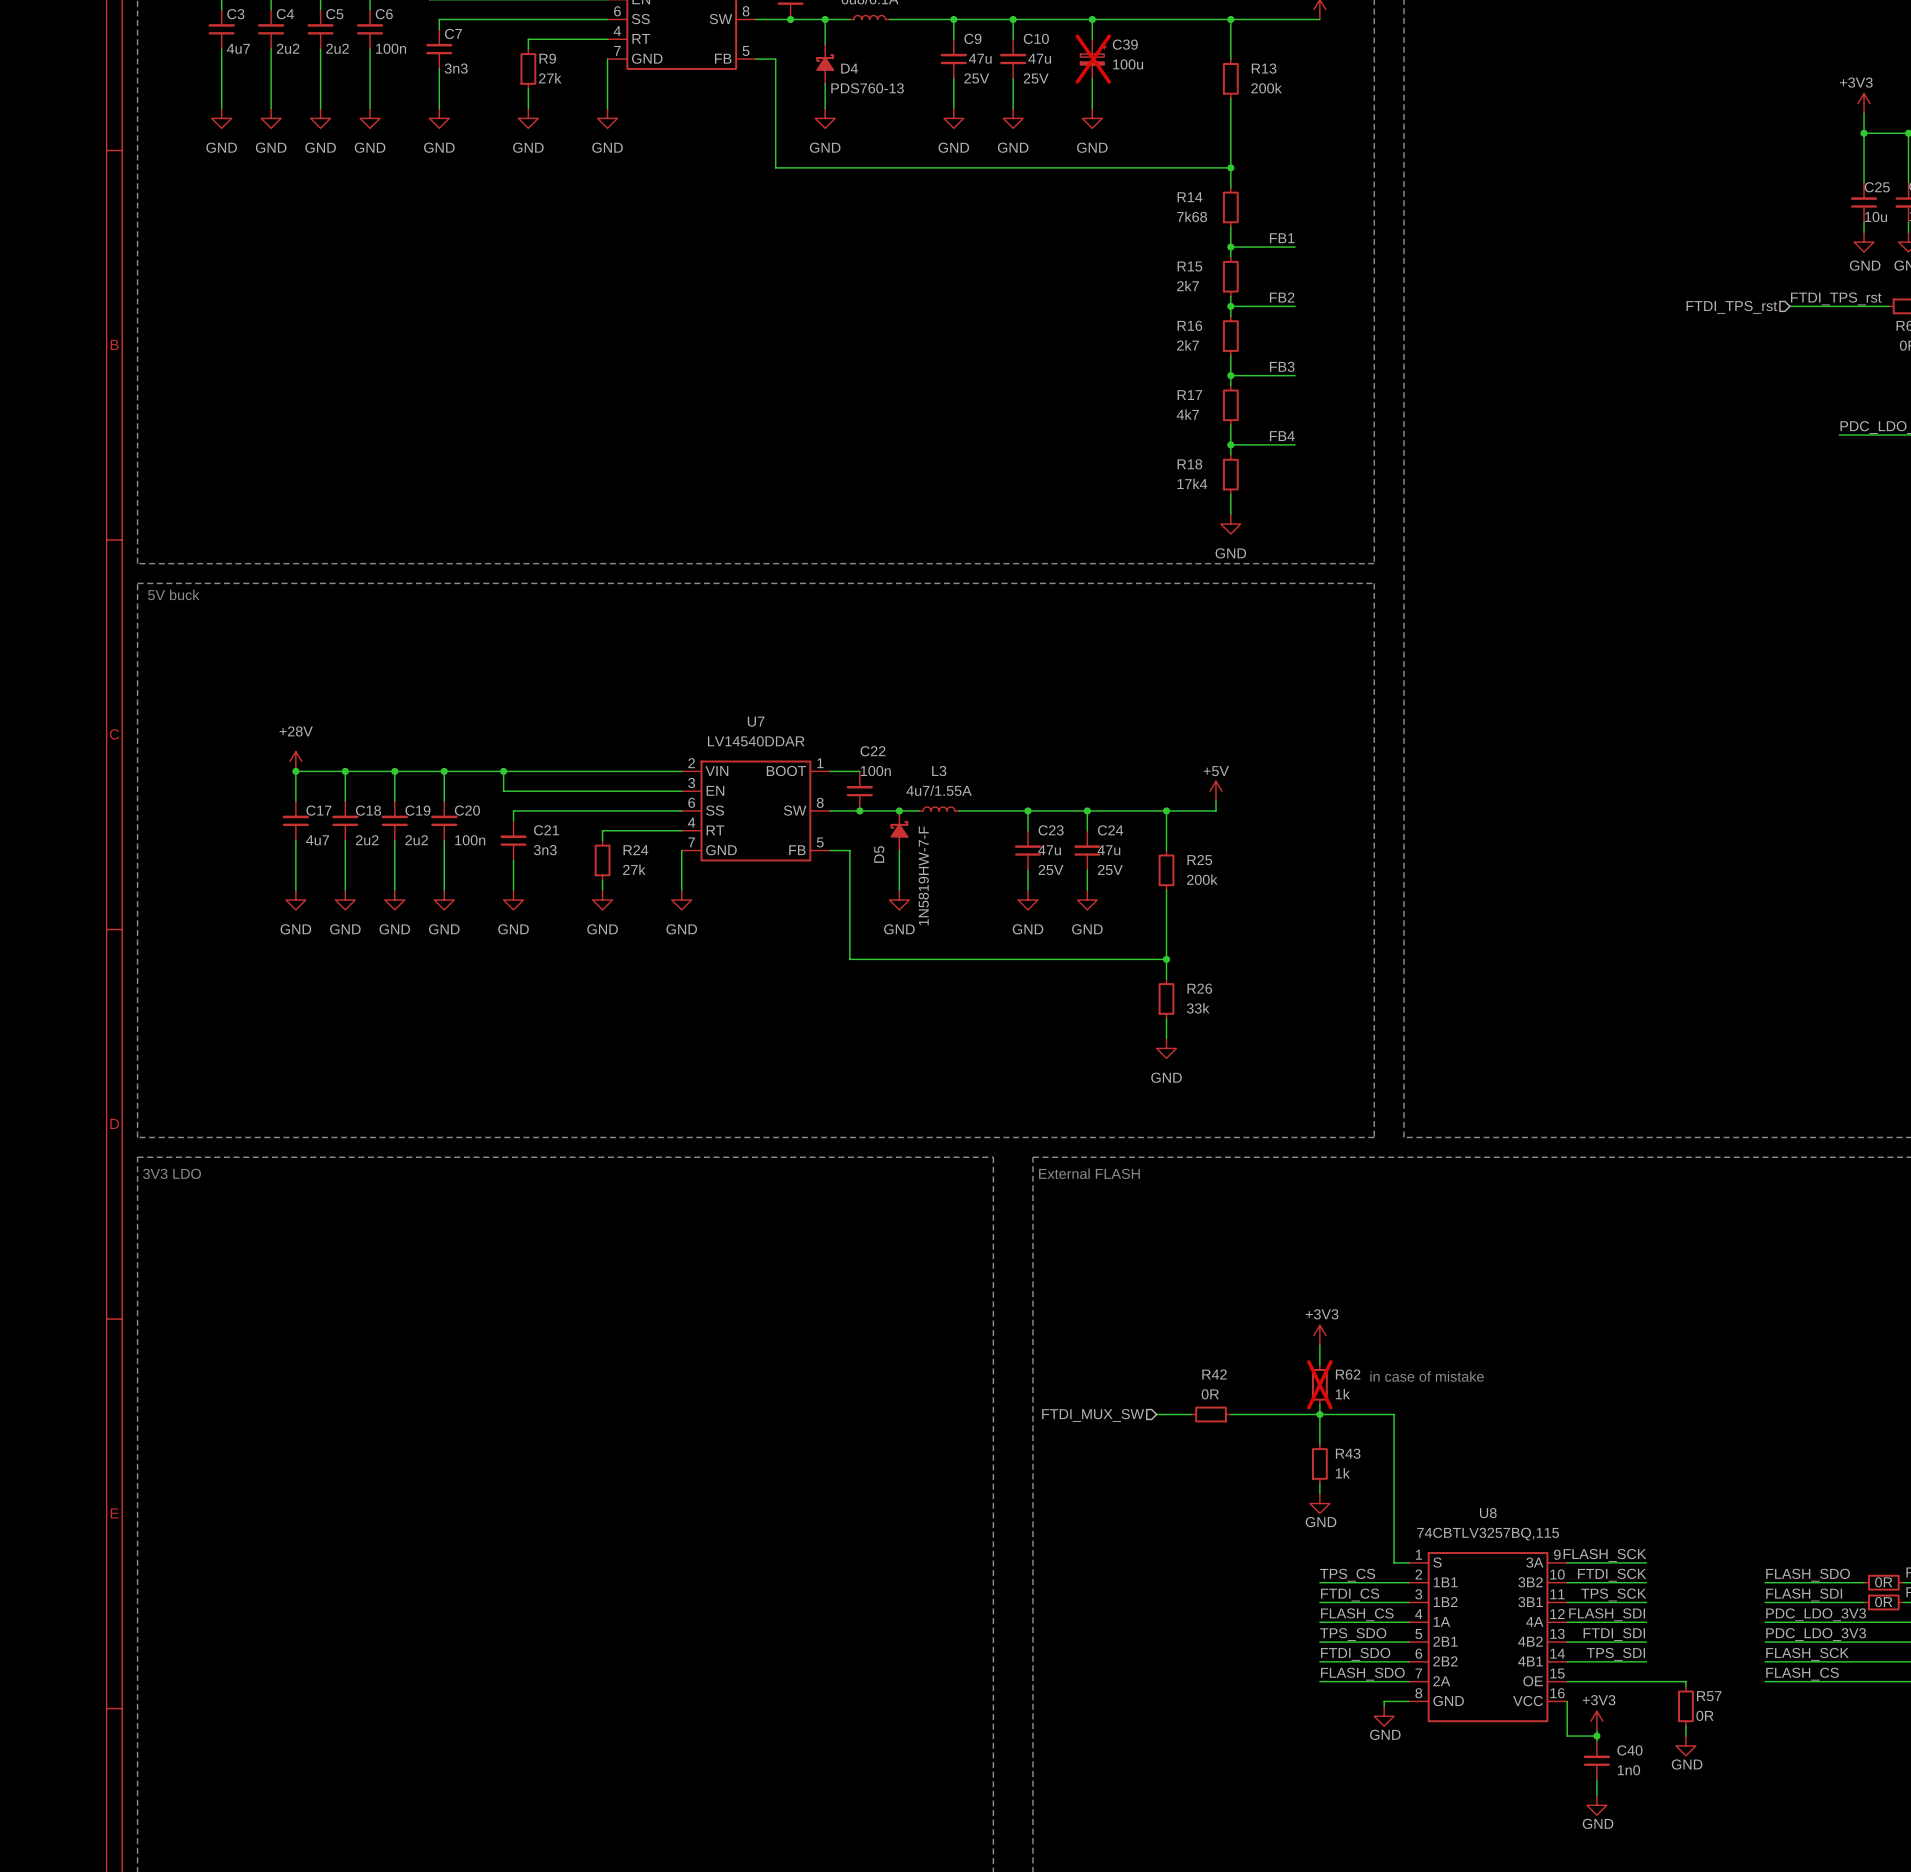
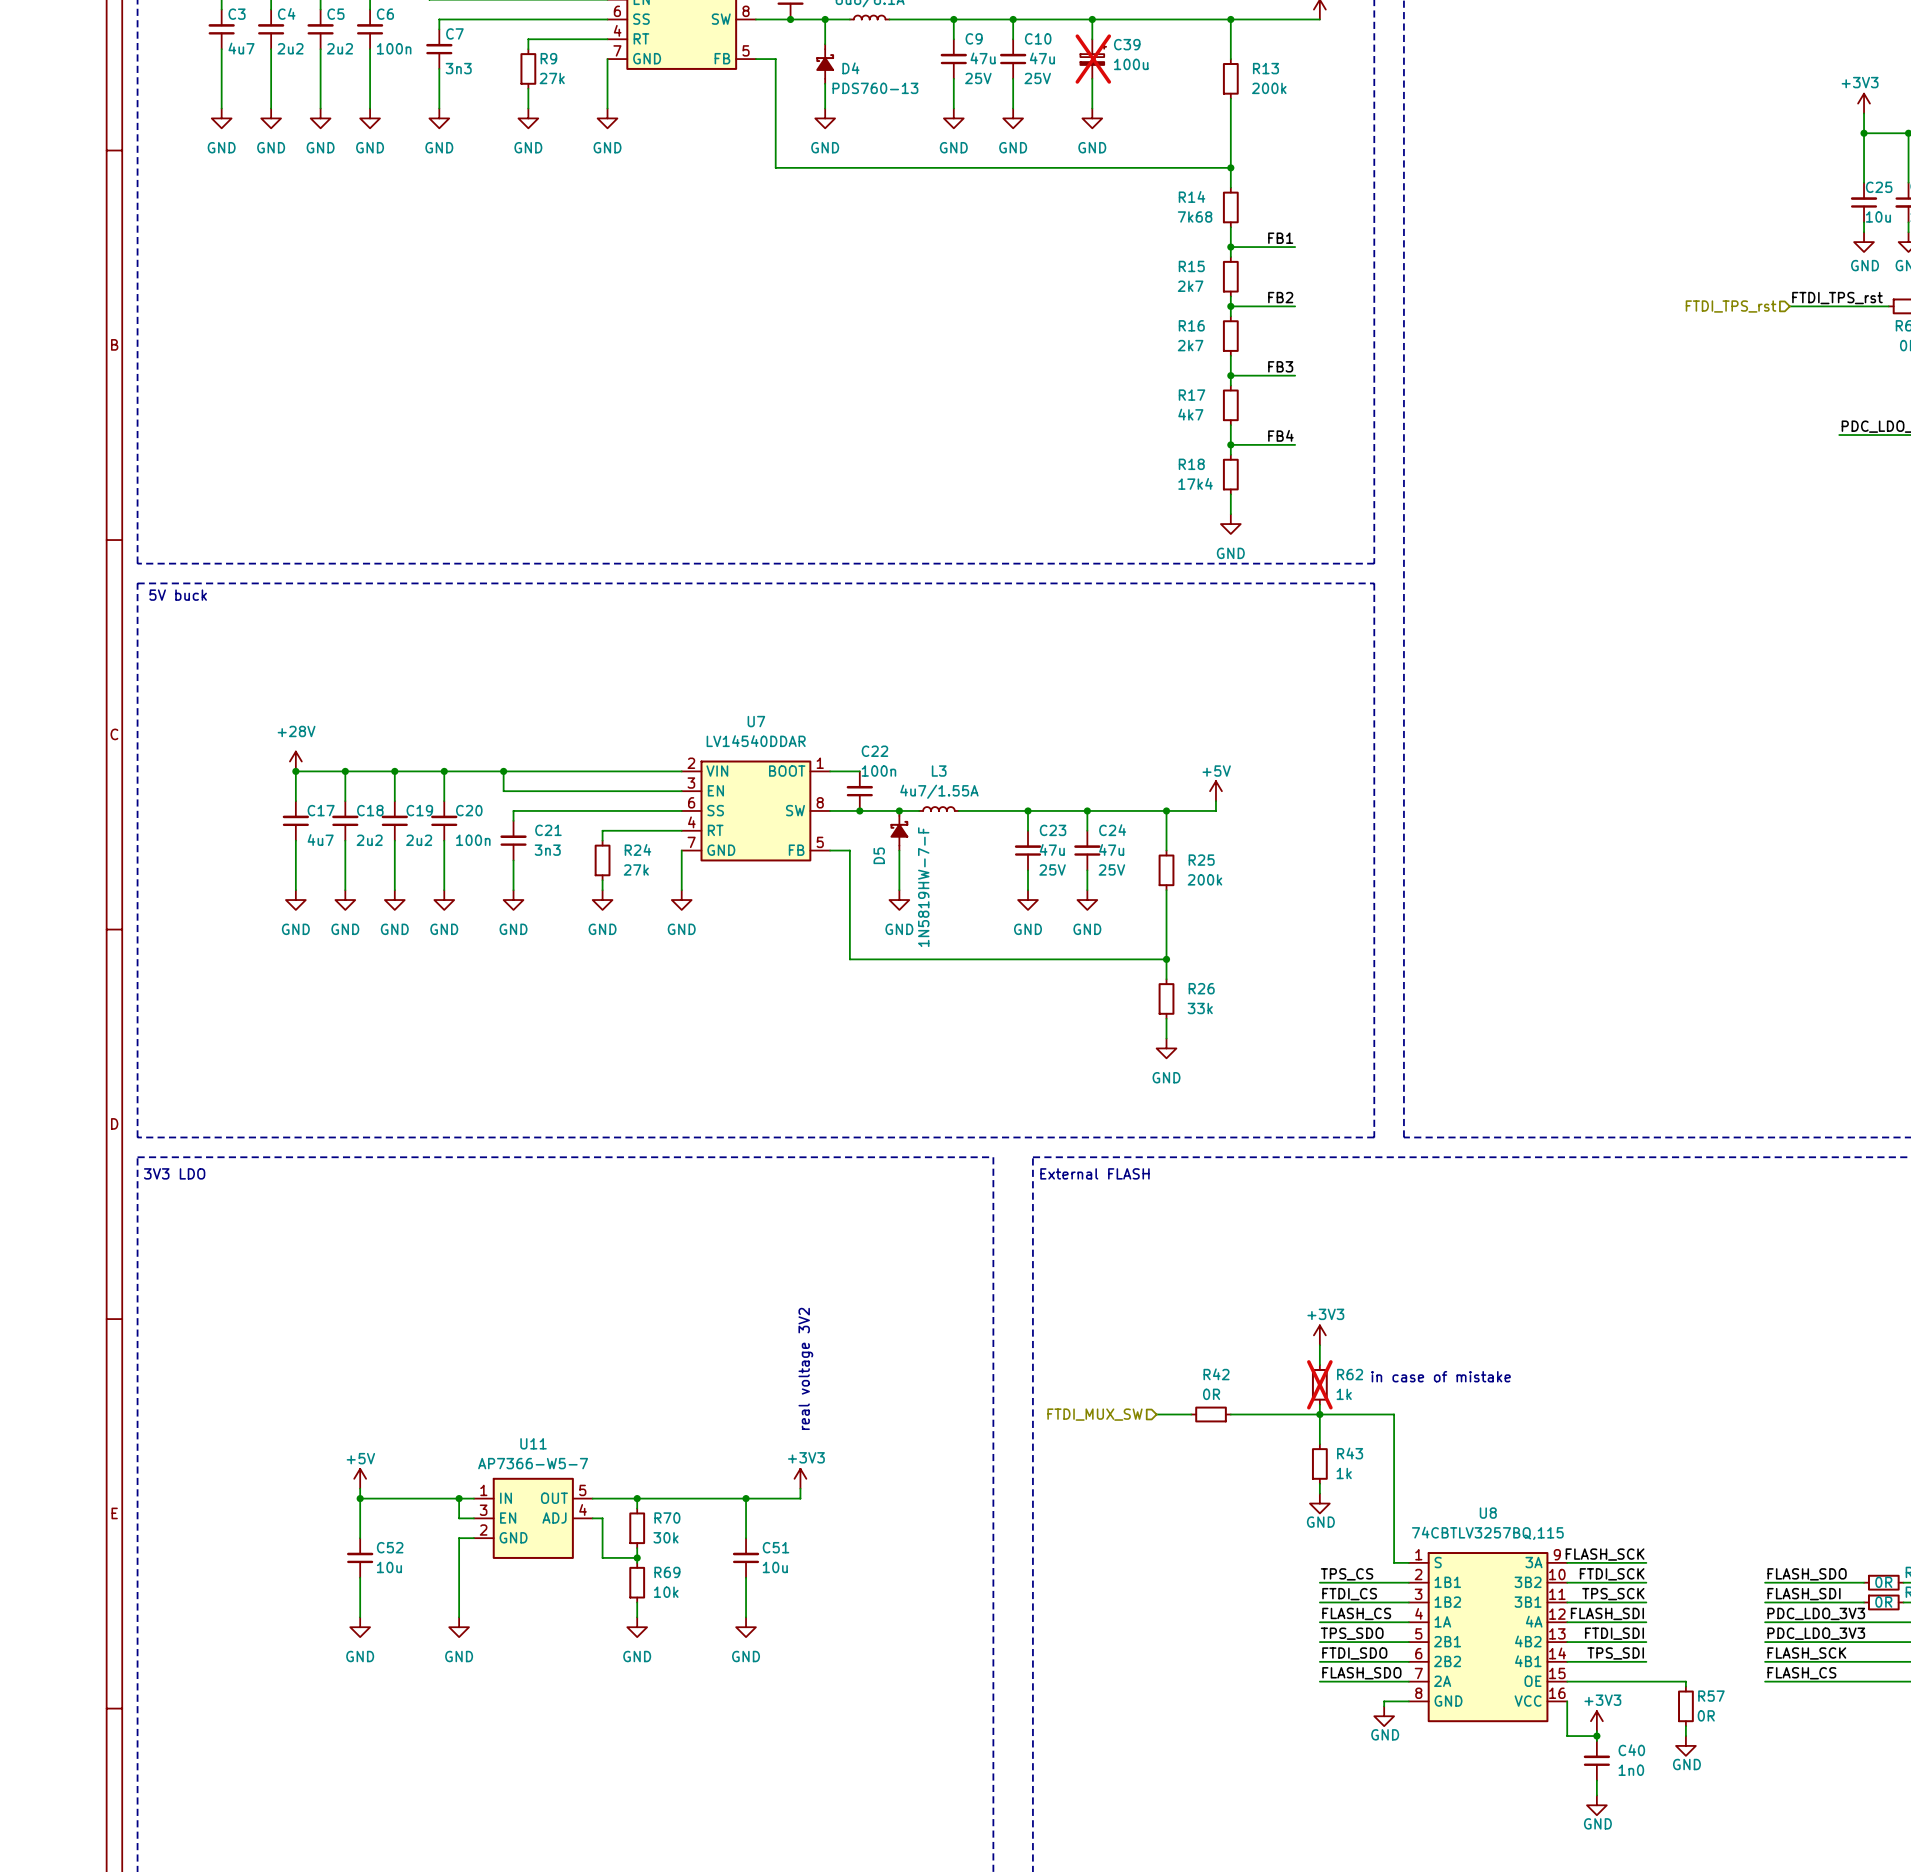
text: none -> real voltage 3V2 (805, 1368)
power symbol: none -> +5V (360, 1478)
power symbol: none -> +3V3 (800, 1478)
wire: none -> (360, 1488) (360, 1538)
wire: none -> (800, 1488) (800, 1498) (592, 1498)
wire: none -> (360, 1498) (473, 1498)
junction: none -> (360, 1498)
wire: none -> (459, 1498) (459, 1518) (473, 1518)
junction: none -> (459, 1498)
wire: none -> (637, 1498) (637, 1508)
junction: none -> (637, 1498)
wire: none -> (746, 1498) (746, 1538)
junction: none -> (746, 1498)
U11: none -> (533, 1518)
wire: none -> (592, 1518) (602, 1518) (602, 1557) (637, 1557)
R70: none -> (637, 1528)
wire: none -> (473, 1538) (459, 1538) (459, 1617)
wire: none -> (637, 1548) (637, 1562)
C52: none -> (360, 1557)
junction: none -> (637, 1557)
C51: none -> (746, 1557)
wire: none -> (360, 1577) (360, 1617)
wire: none -> (746, 1577) (746, 1617)
R69: none -> (637, 1582)
wire: none -> (637, 1602) (637, 1617)
power symbol: none -> GND (360, 1627)
power symbol: none -> GND (459, 1627)
power symbol: none -> GND (637, 1627)
power symbol: none -> GND (746, 1627)

